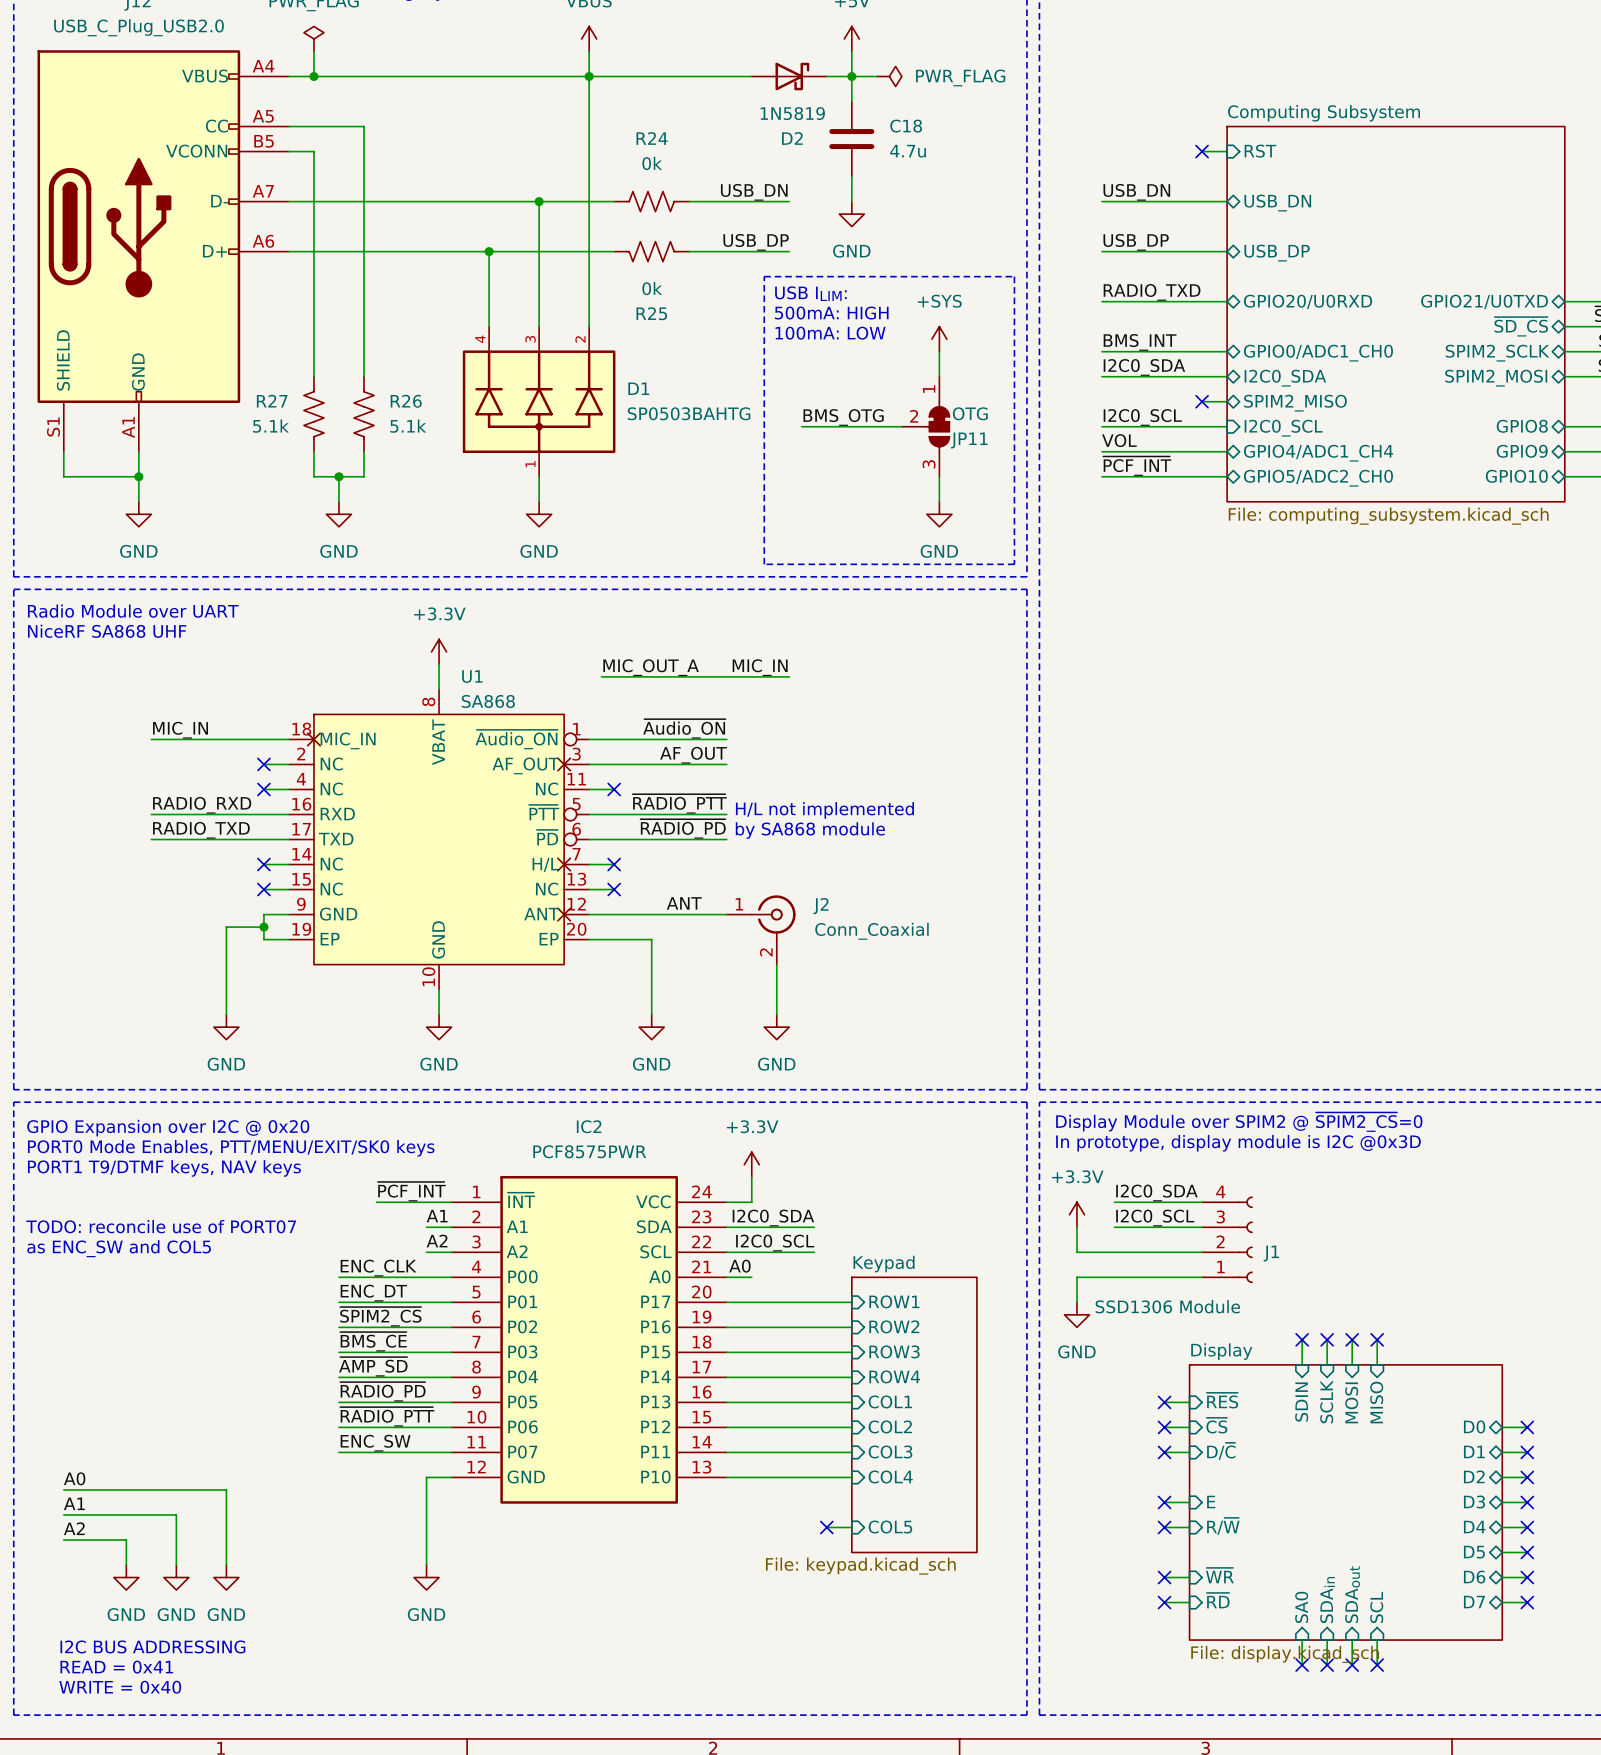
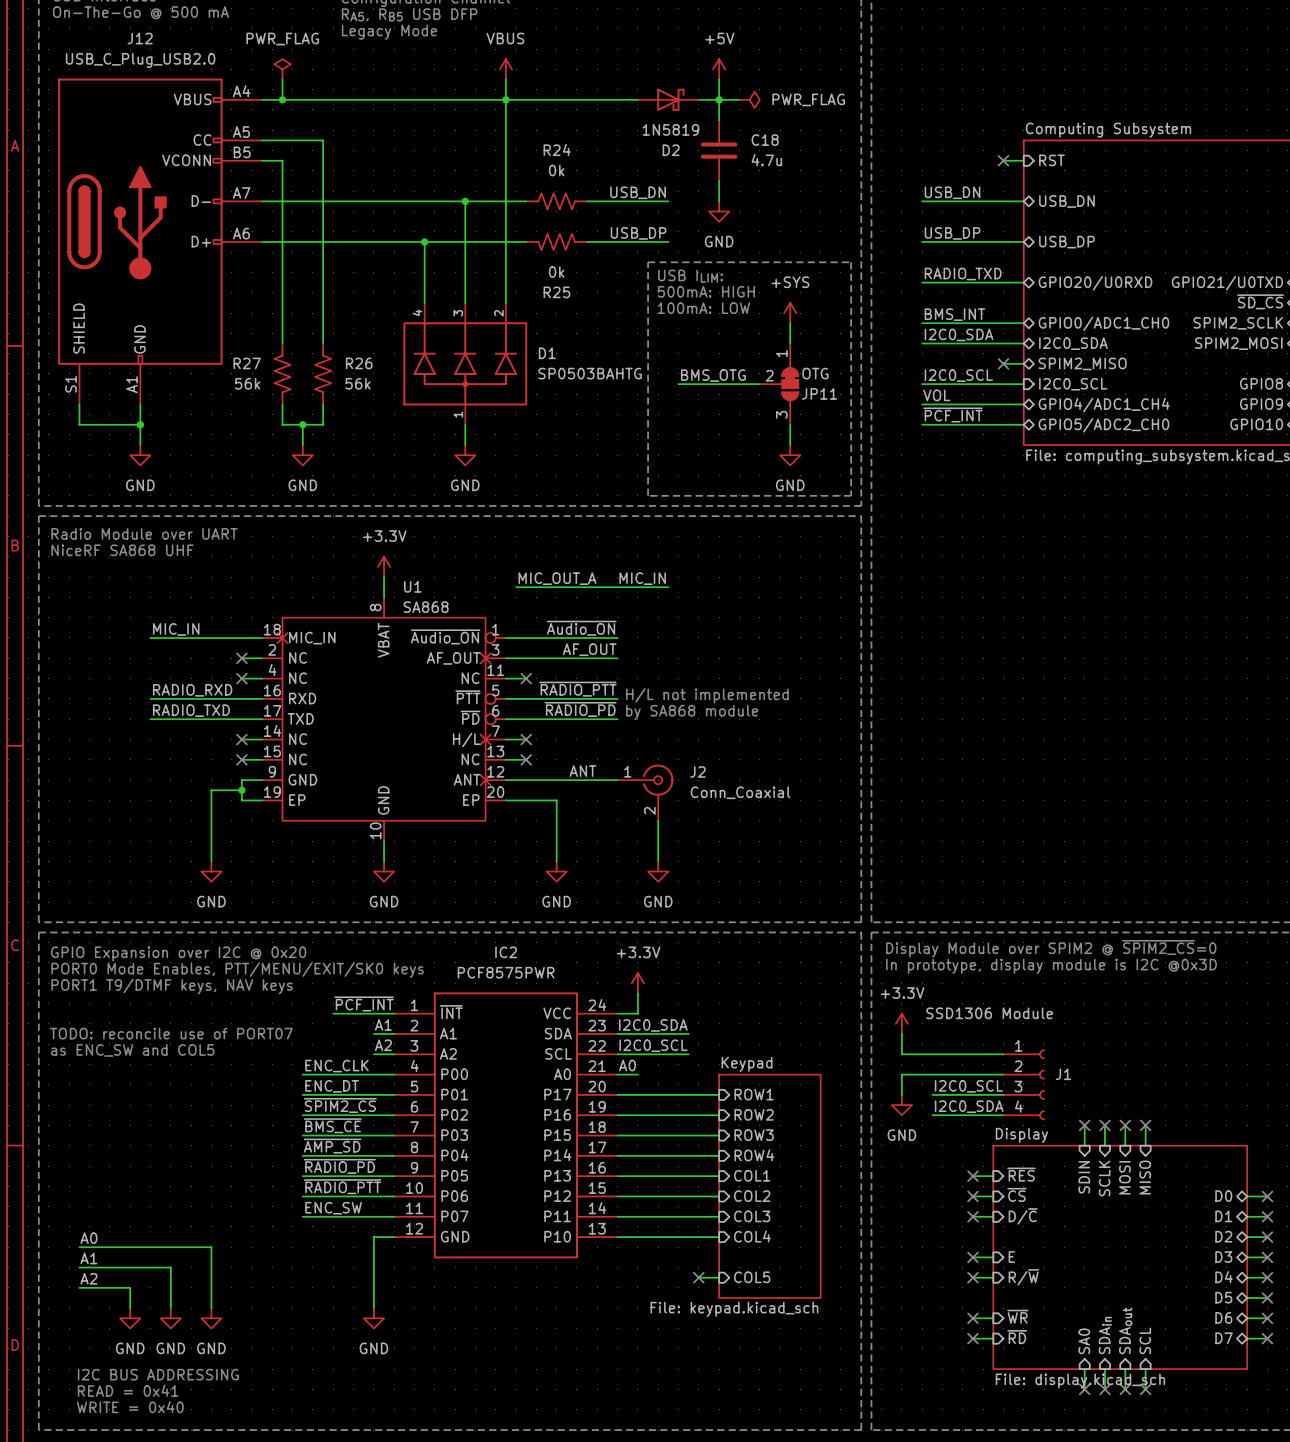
R27 value: 5.1k (270, 426) -> 56k (247, 383)
R26 value: 5.1k (408, 426) -> 56k (358, 383)
label position: I2C0_SDA (1156, 1193) -> I2C0_SDA (969, 1106)
wire: (1114, 1202) (1202, 1202) -> (932, 1115) (1003, 1115)
label position: I2C0_SCL (1155, 1218) -> I2C0_SCL (968, 1086)
wire: (1114, 1227) (1202, 1227) -> (932, 1094) (1003, 1094)
J1 flip: as is (1245, 1239) -> up-down (1039, 1084)
J1 value position: SSD1306 Module (1167, 1306) -> SSD1306 Module (989, 1013)

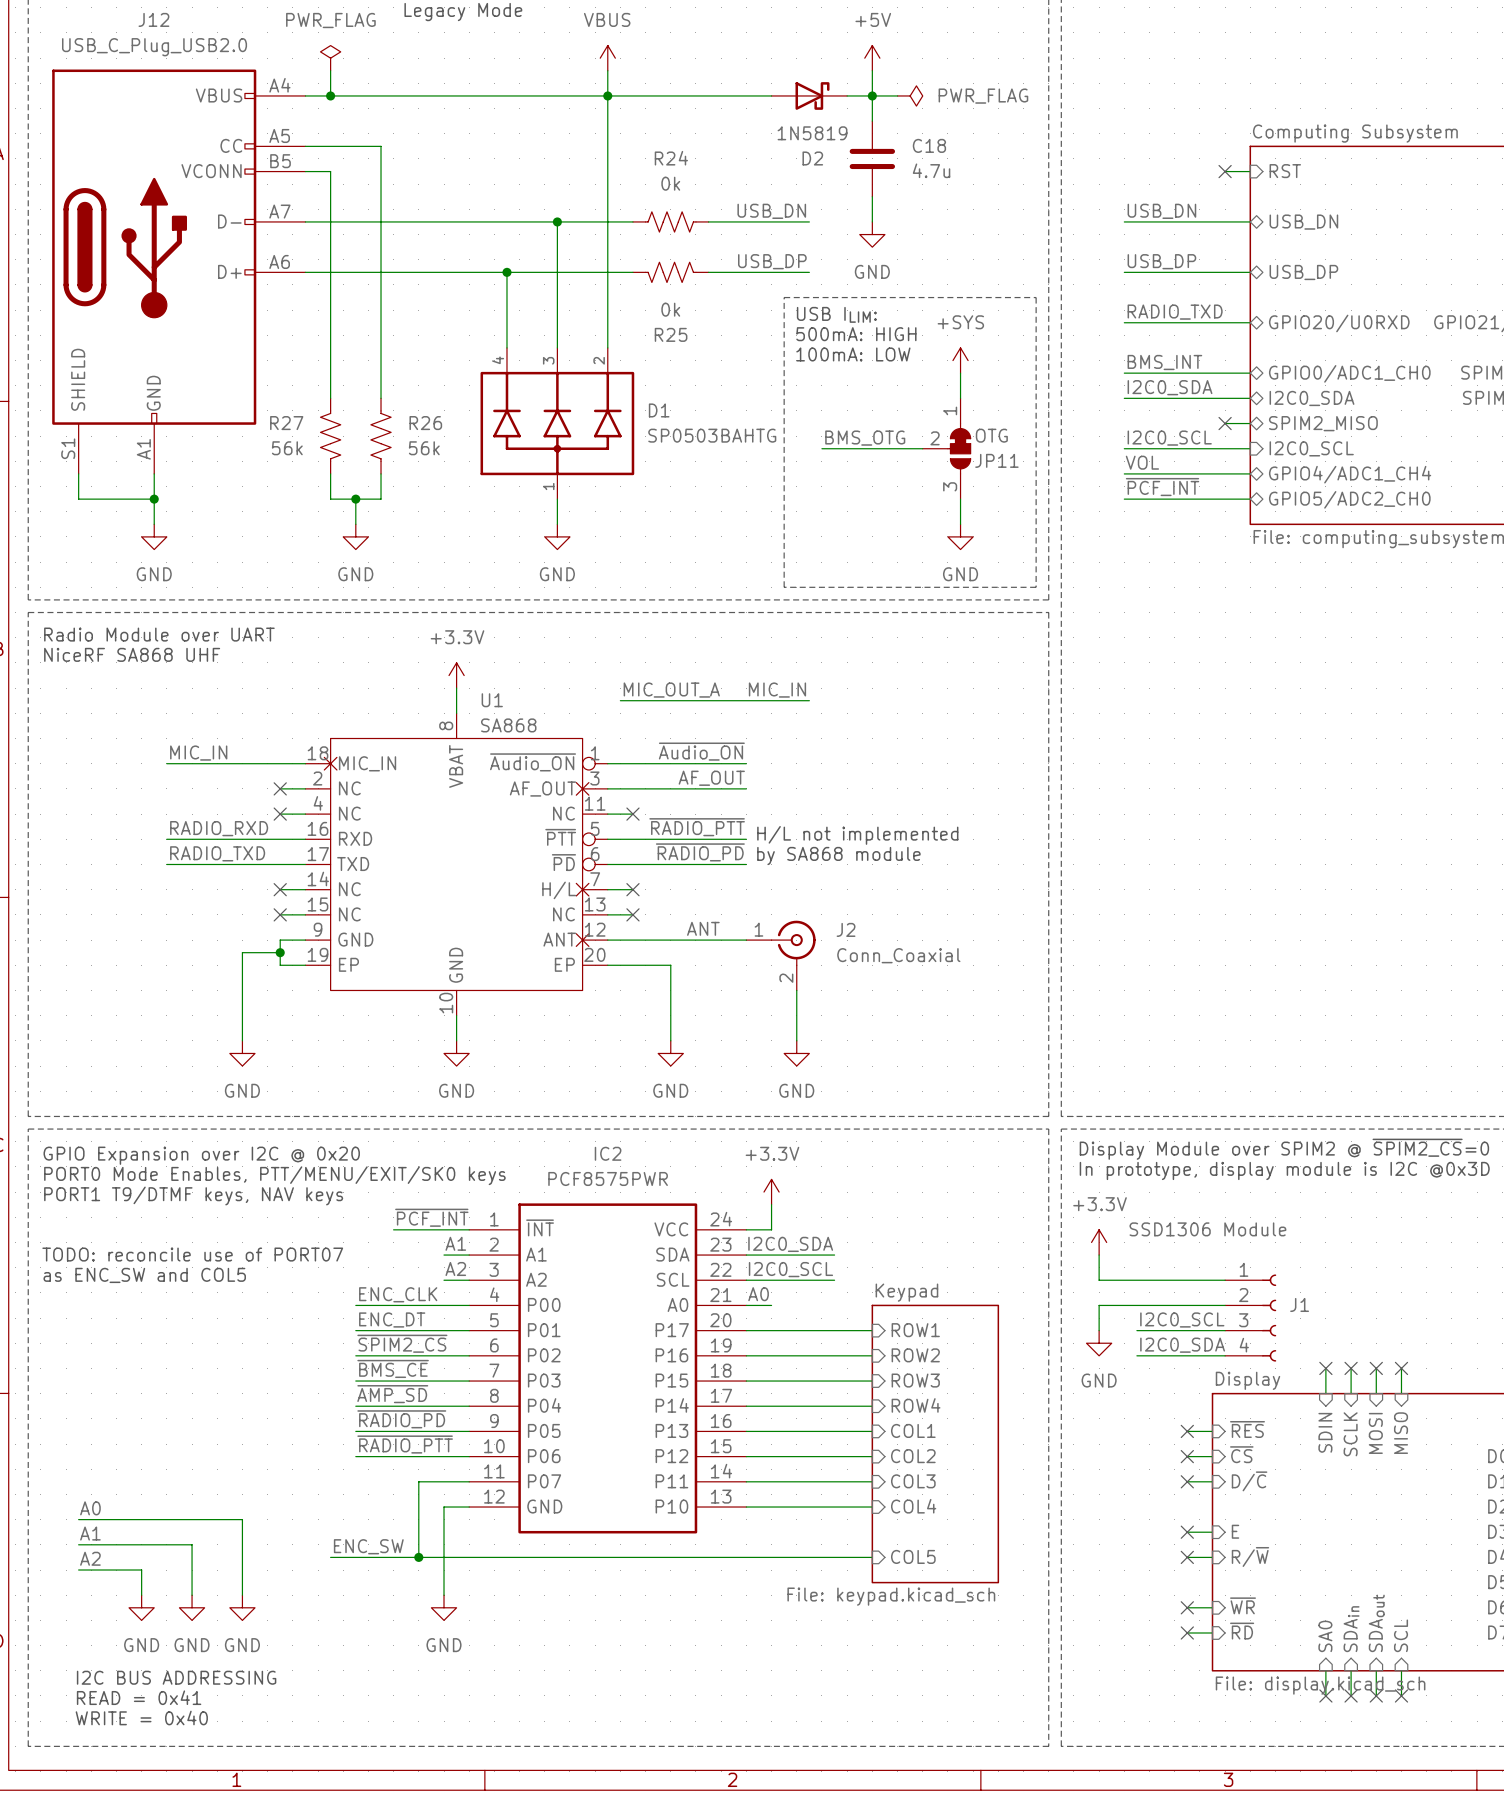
label position: ENC_SW (333, 1208) -> ENC_SW (368, 1546)
wire: (302, 1216) (353, 1216) -> (418, 1557) (418, 1481)
wire: none -> (330, 1557) (847, 1557)
junction: none -> (418, 1557)
no-connect mark: (698, 1277) -> none

